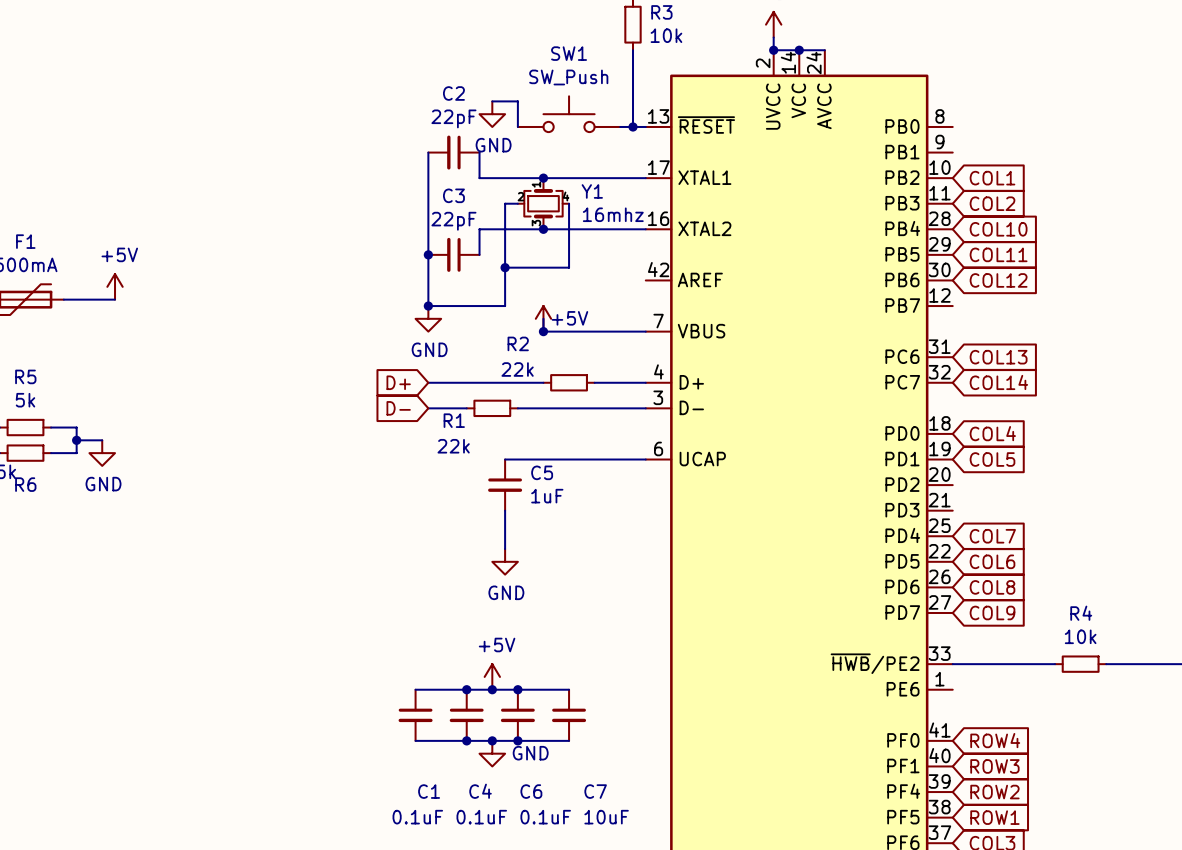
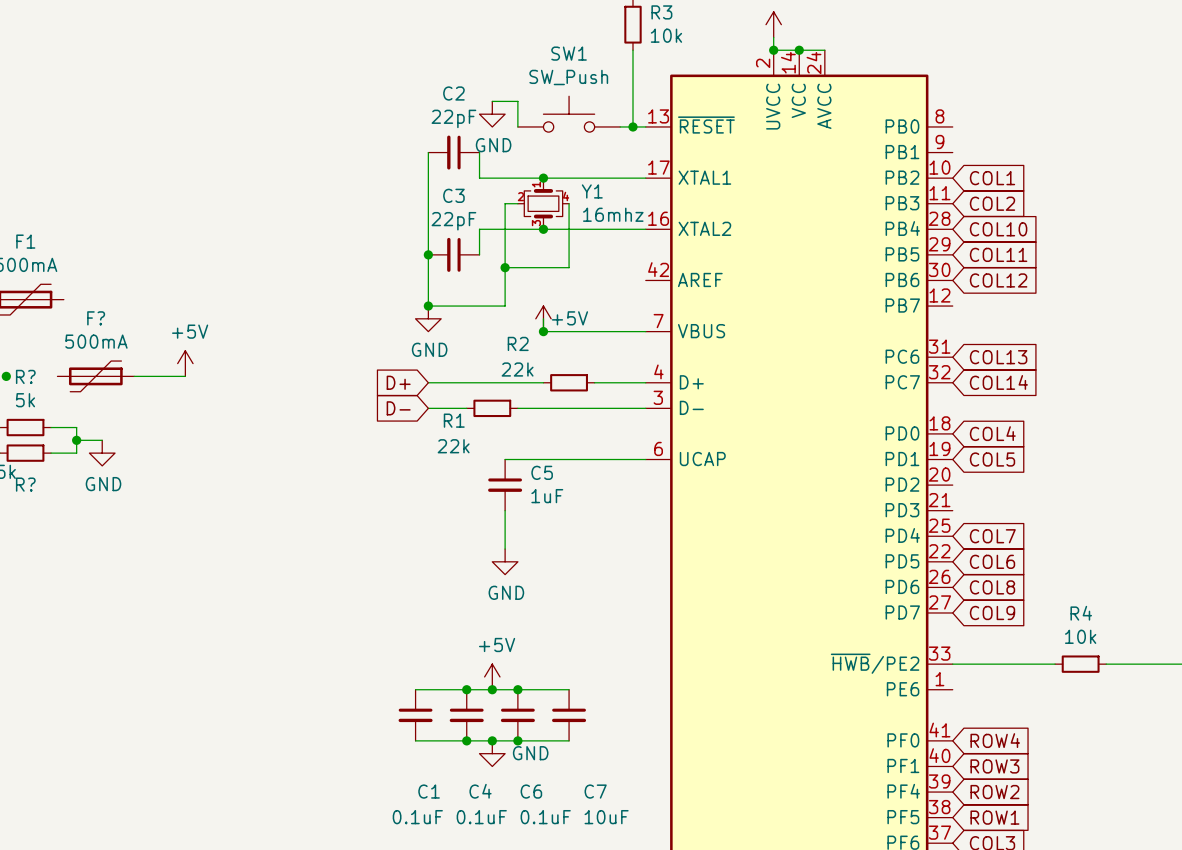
power symbol position: +5V (115, 286) -> +5V (185, 363)
wire: (63, 299) (115, 299) -> (134, 376) (185, 376)
junction: none -> (6, 376)
R5 name: R5 (25, 376) -> R? (25, 376)
F?: none -> 500mA (95, 376)
R6 name: R6 (25, 484) -> R? (25, 484)

